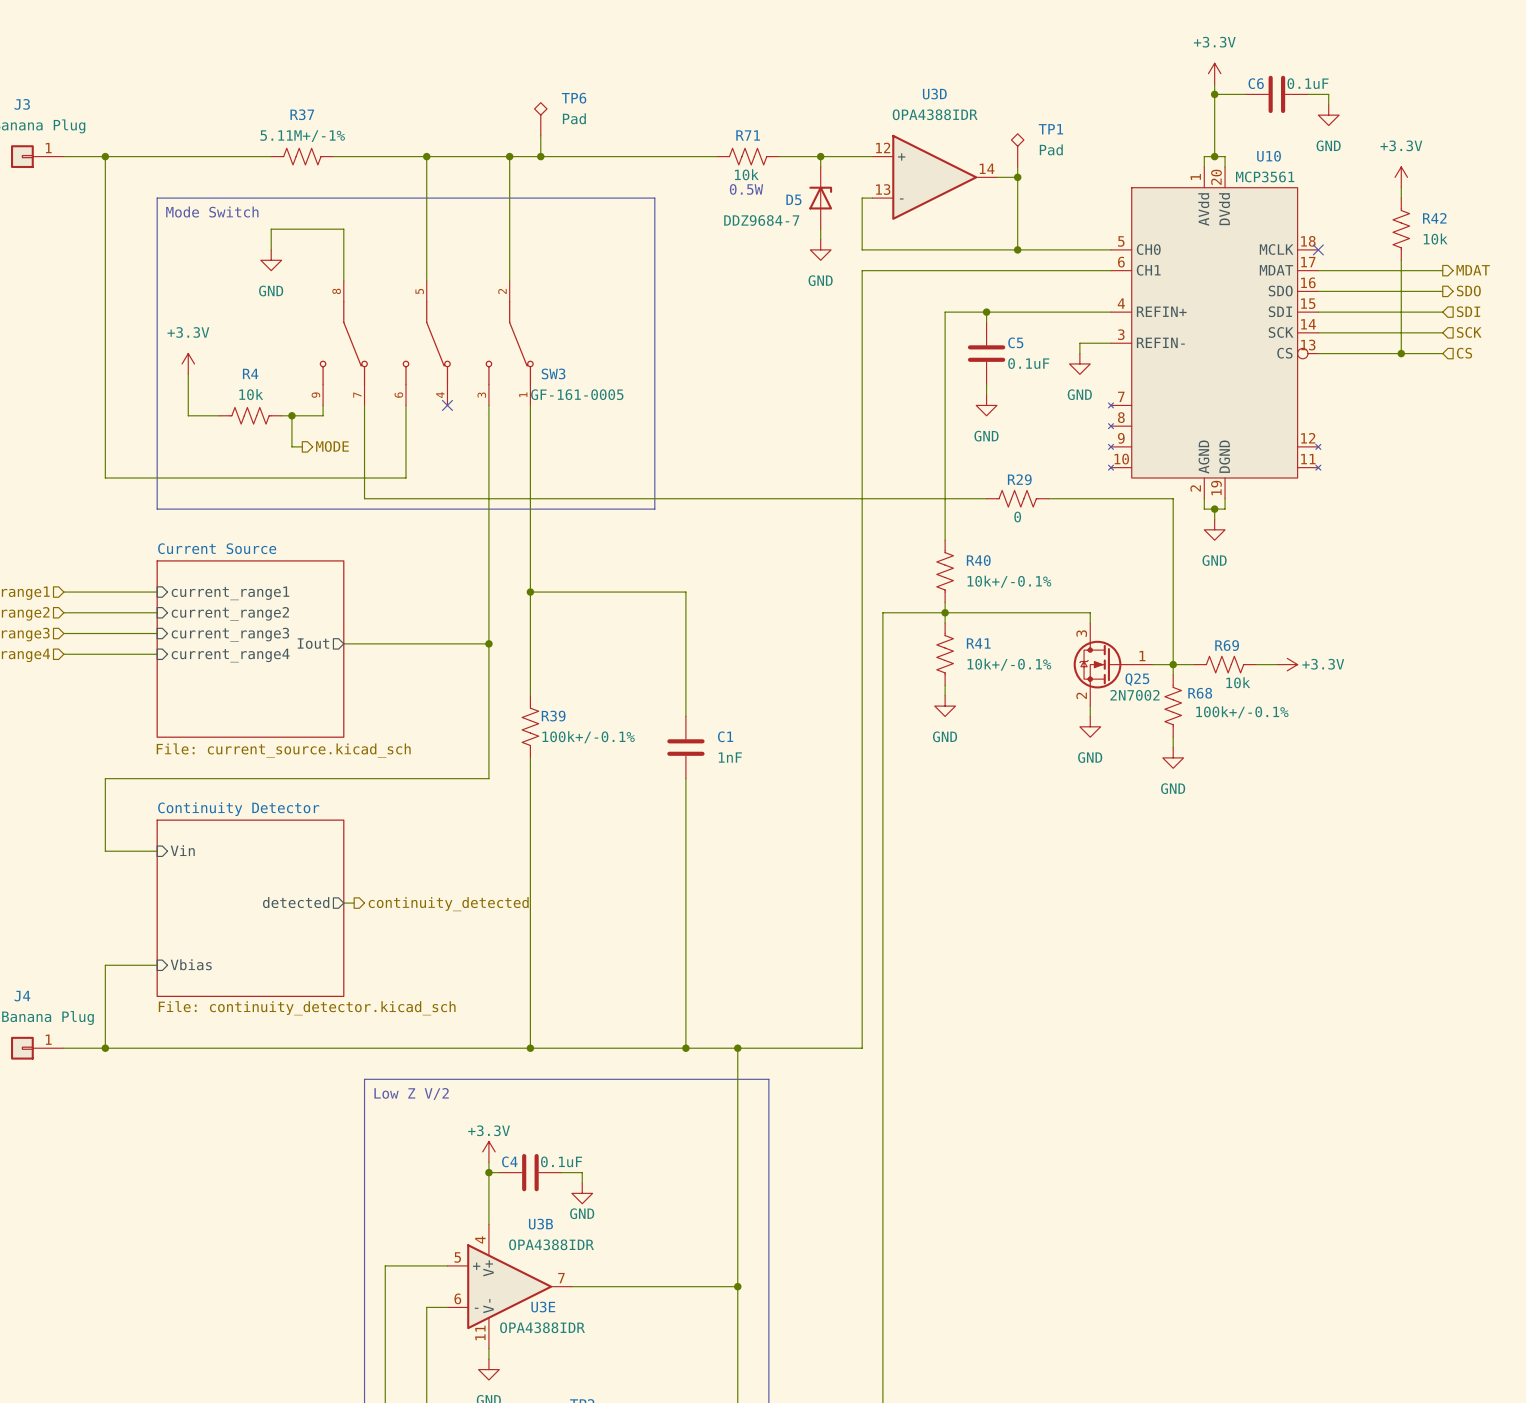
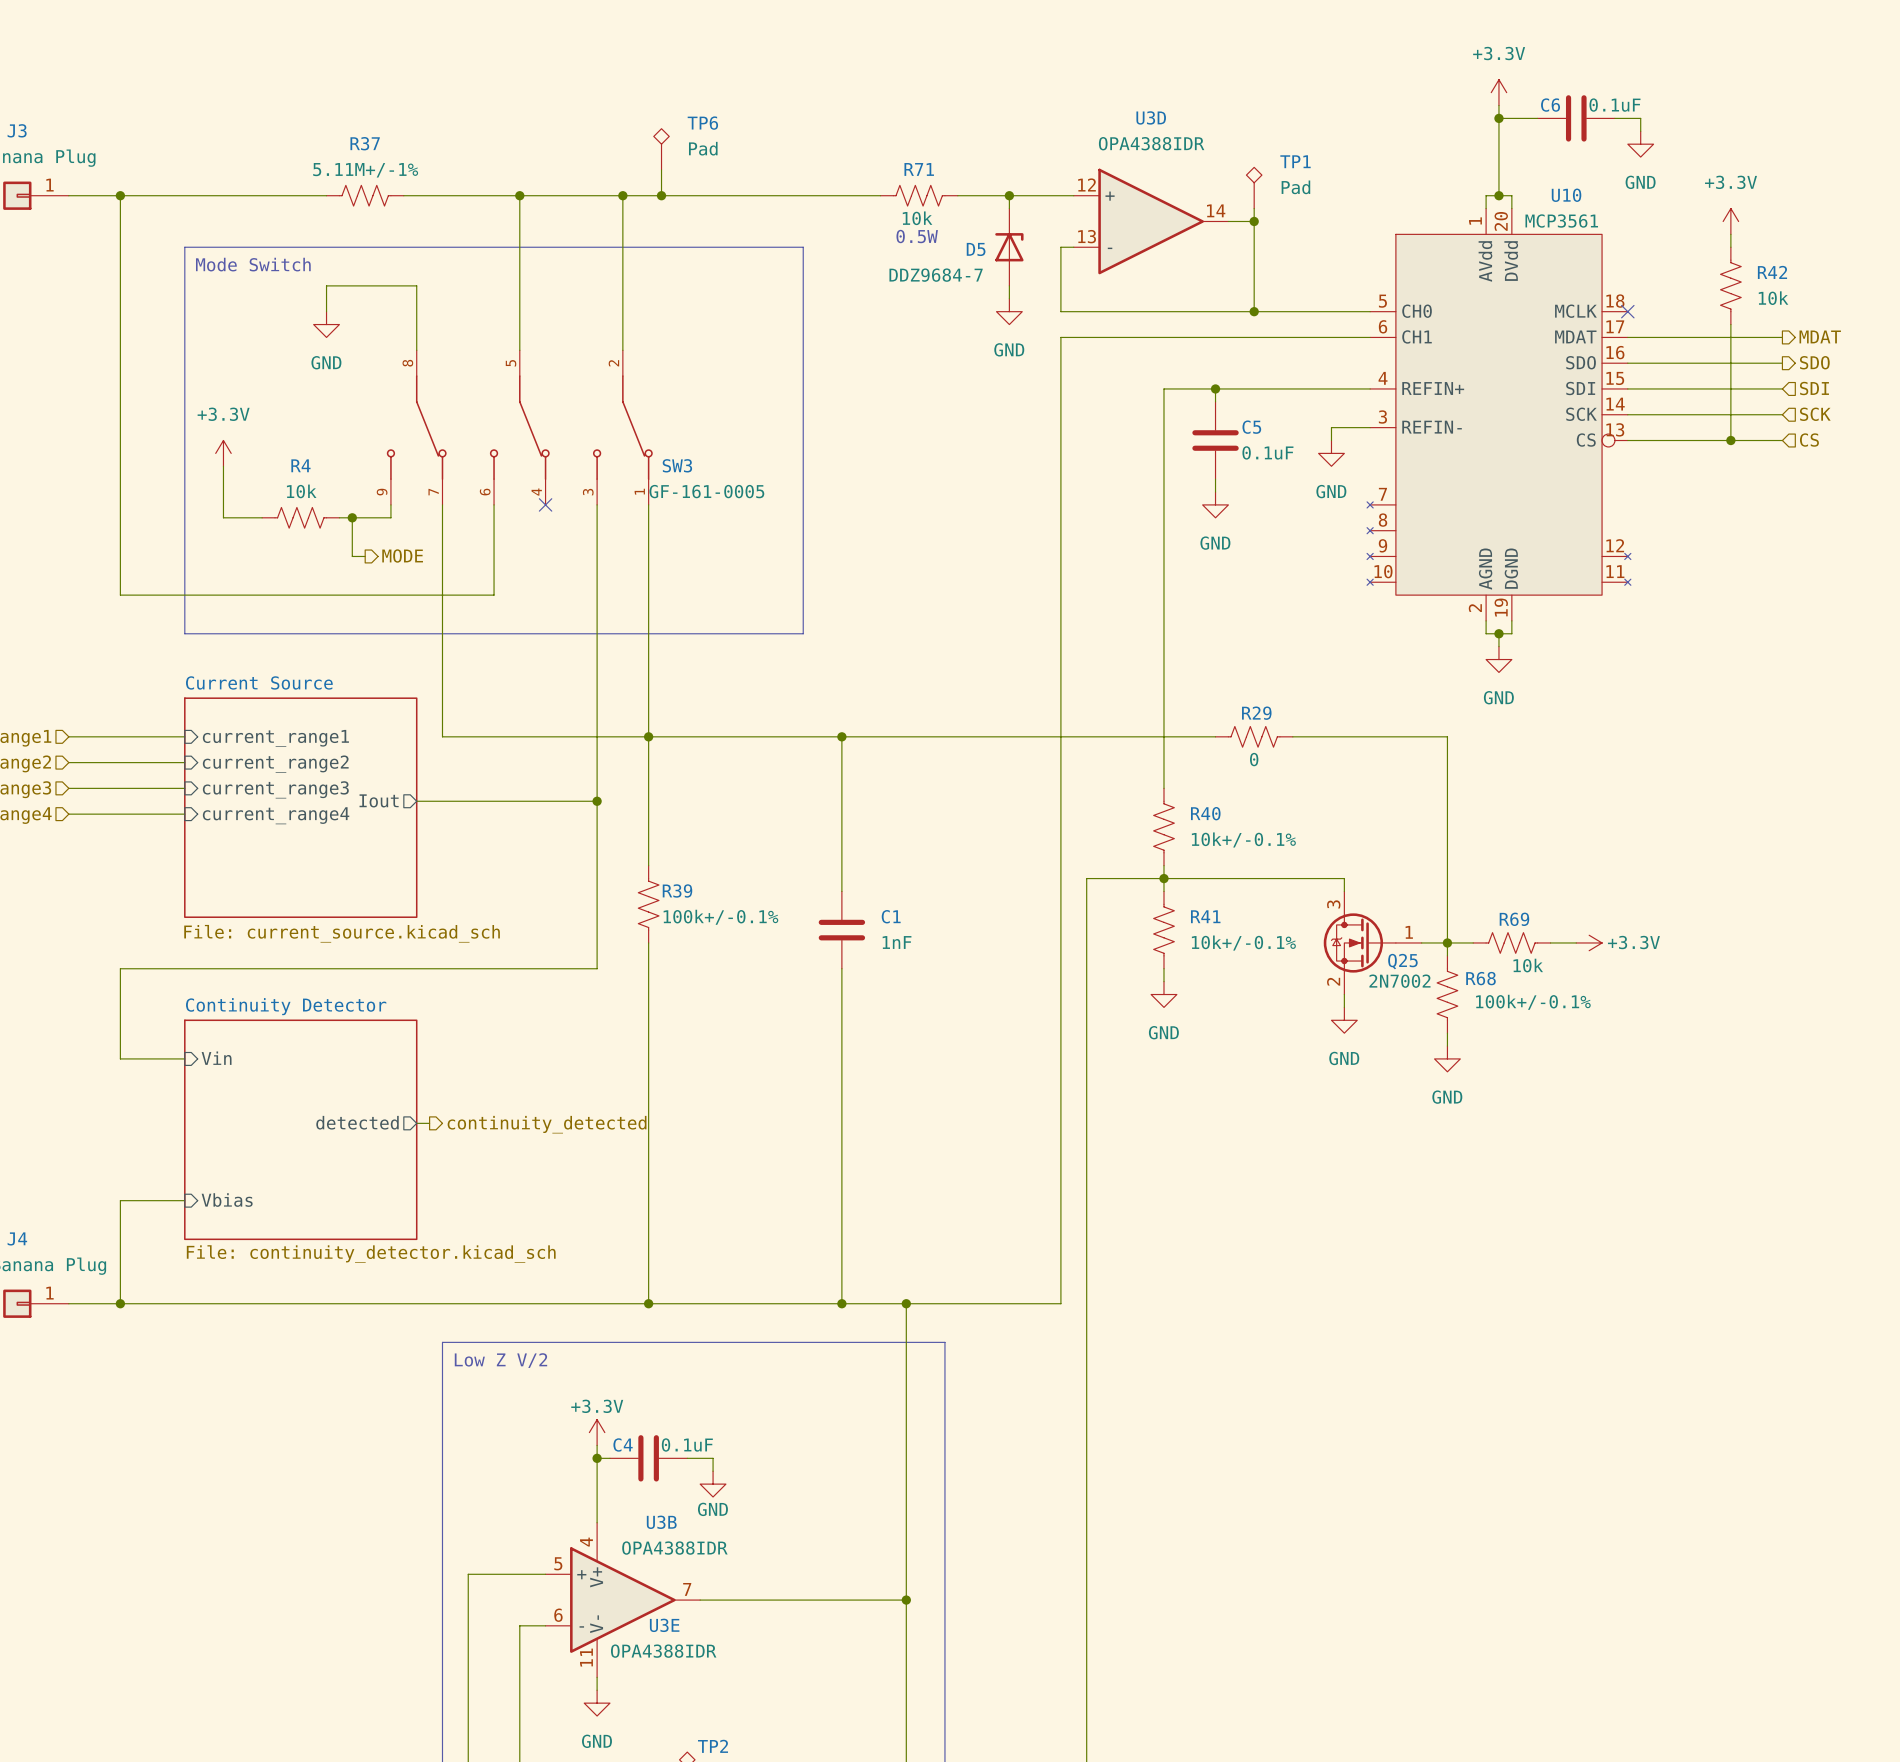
wire: (364, 498) (986, 498) -> (442, 620) (442, 736) (648, 736)
R29 position: (1017, 498) -> (1254, 736)
wire: (1048, 498) (1173, 498) (1173, 592) -> (1292, 736) (1447, 736)
R40 position: (945, 571) -> (1163, 827)
wire: none -> (841, 736) (1215, 736)
junction: none -> (841, 736)
junction: (945, 612) -> none
wire: (1090, 623) (1090, 612) (882, 612) (882, 706) -> (1344, 878) (1086, 878)
R41 position: (945, 654) -> (1163, 930)
Q25 position: (1113, 664) -> (1372, 942)
wire: (1152, 664) (1193, 664) -> (1421, 942) (1473, 942)
junction: (1173, 664) -> none
R69 position: (1225, 664) -> (1511, 942)
wire: (1256, 664) (1276, 664) -> (1550, 942) (1576, 942)
power symbol position: +3.3V (1287, 664) -> +3.3V (1589, 942)
junction: none -> (1163, 878)
power symbol: GND (945, 706) -> none
R68 position: (1173, 706) -> (1447, 994)
power symbol: GND (1090, 726) -> none
junction: none -> (1447, 942)
power symbol: GND (1173, 757) -> none
wire: none -> (1163, 968) (1163, 981)
power symbol: none -> GND (1163, 994)
wire: none -> (1344, 994) (1344, 1007)
power symbol: none -> GND (1344, 1020)
wire: none -> (1447, 1033) (1447, 1046)
power symbol: none -> GND (1447, 1058)

